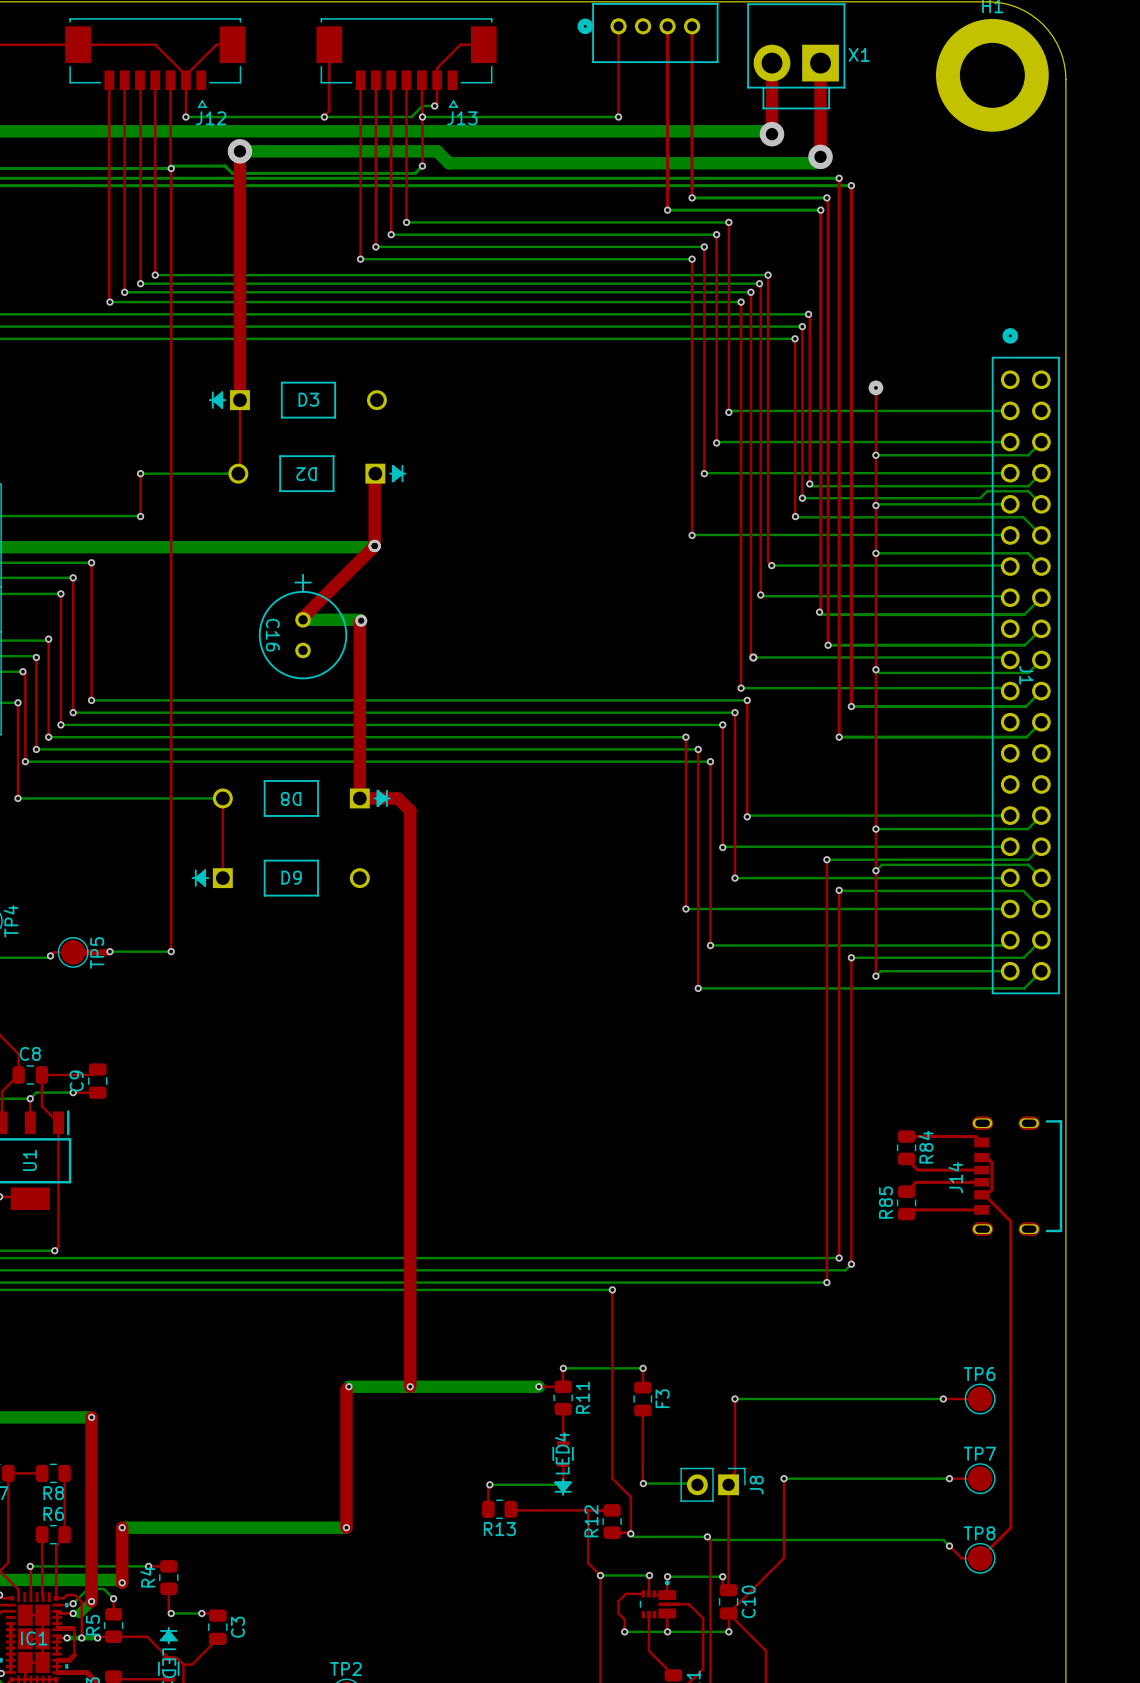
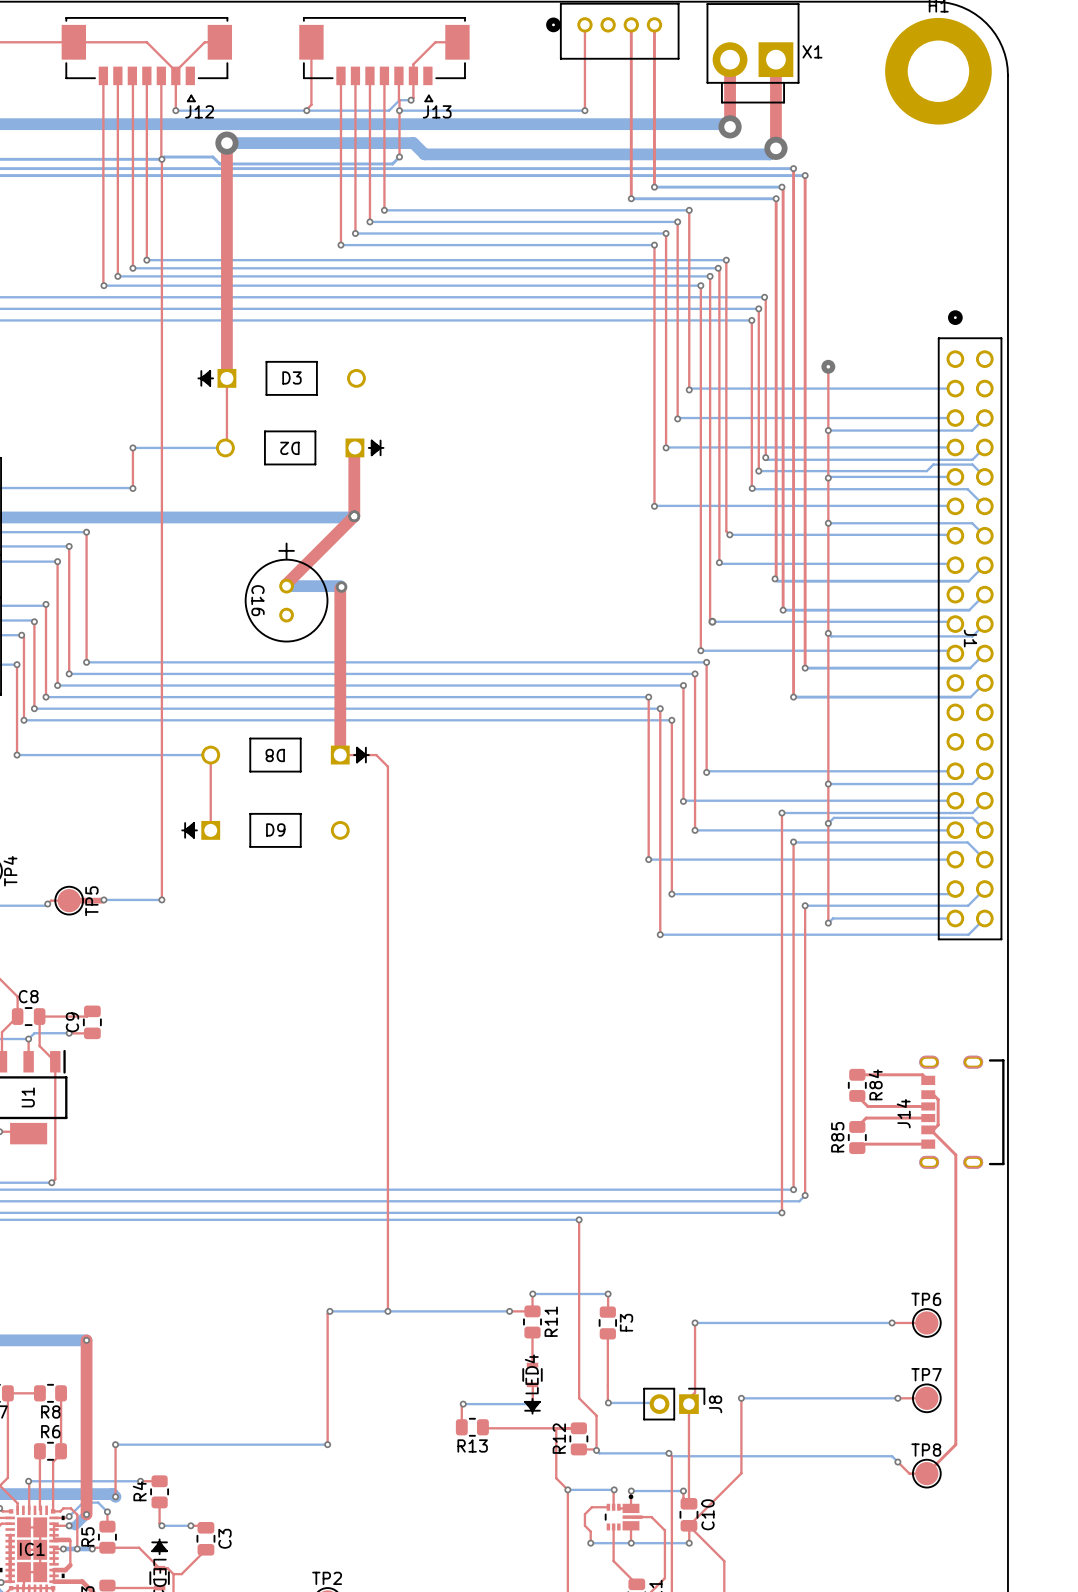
top track width: thick (359, 798) (397, 798) (410, 810) (410, 1386) -> thin (340, 755) (376, 755) (387, 766) (387, 1311)
bottom track width: thick (348, 1386) (538, 1386) -> thin (329, 1311) (509, 1311)
top track width: thick (346, 1389) (346, 1527) -> thin (327, 1313) (327, 1444)
top track width: thick (122, 1527) (122, 1582) -> thin (115, 1444) (115, 1496)
bottom track width: thick (122, 1527) (346, 1527) -> thin (115, 1444) (327, 1444)

